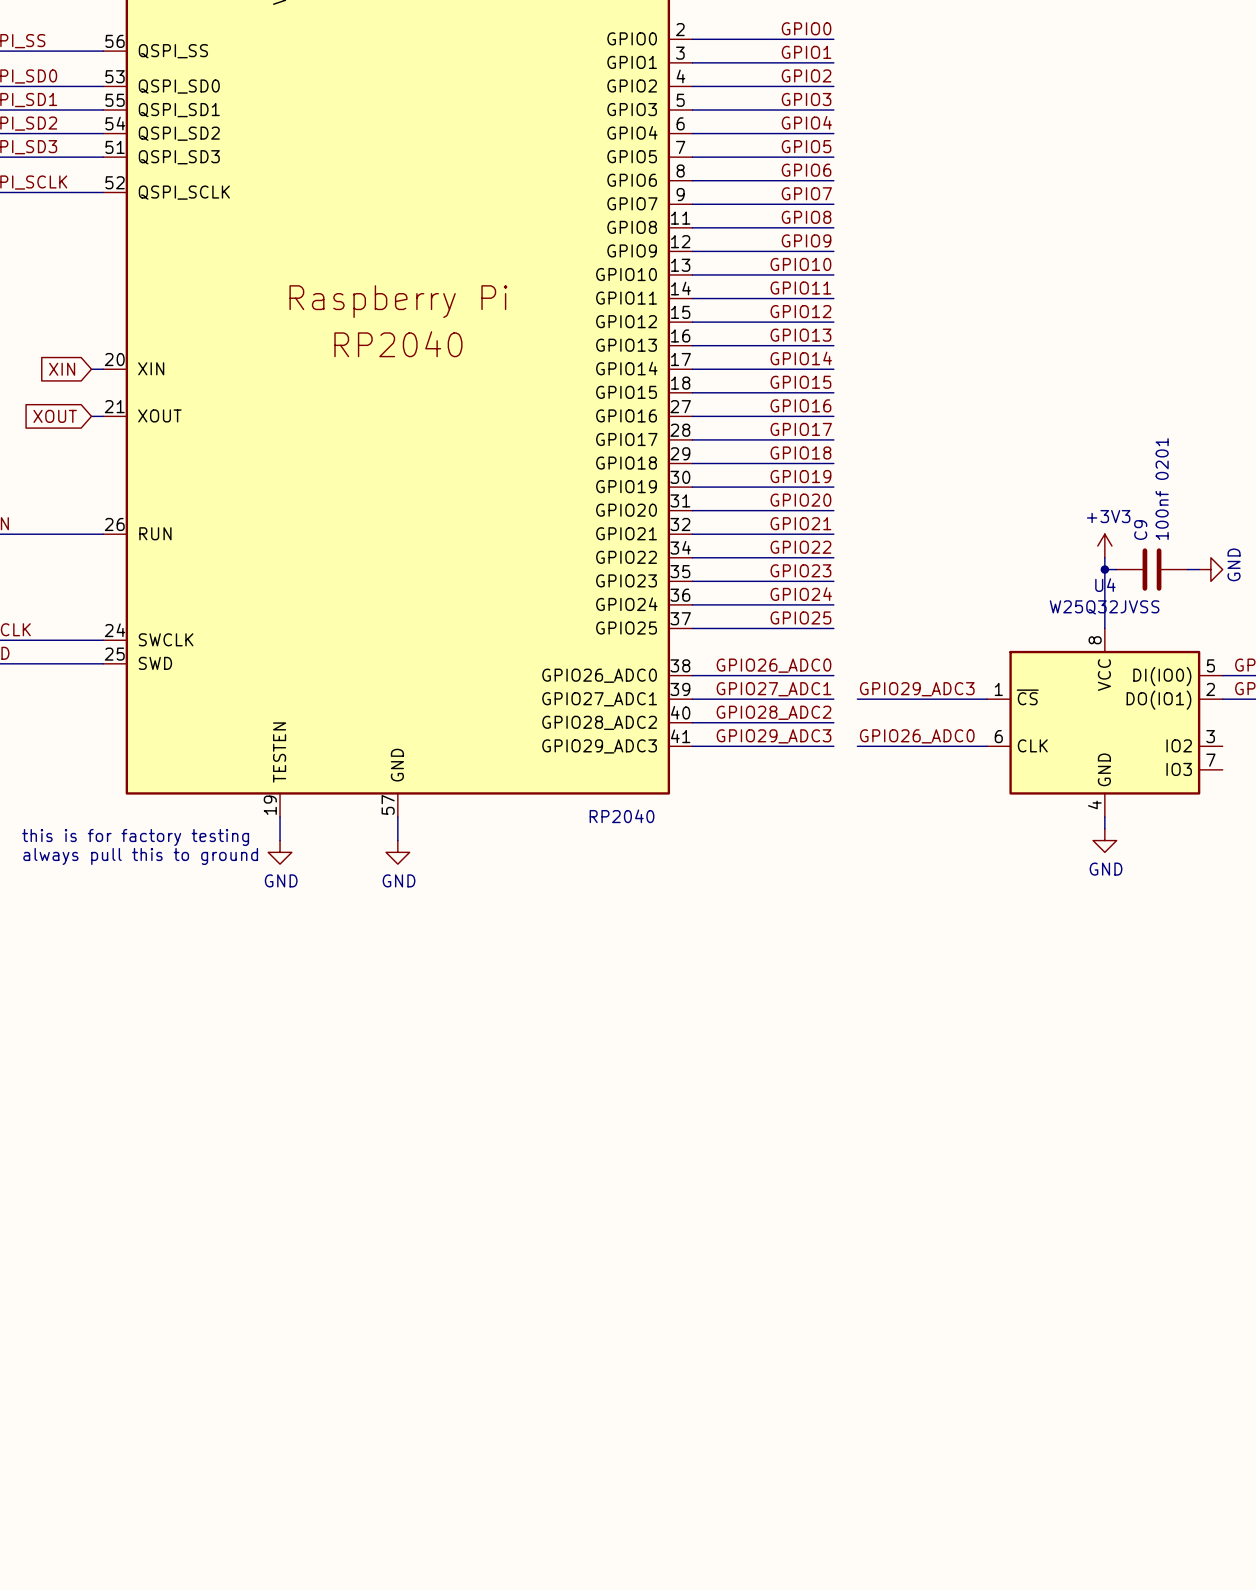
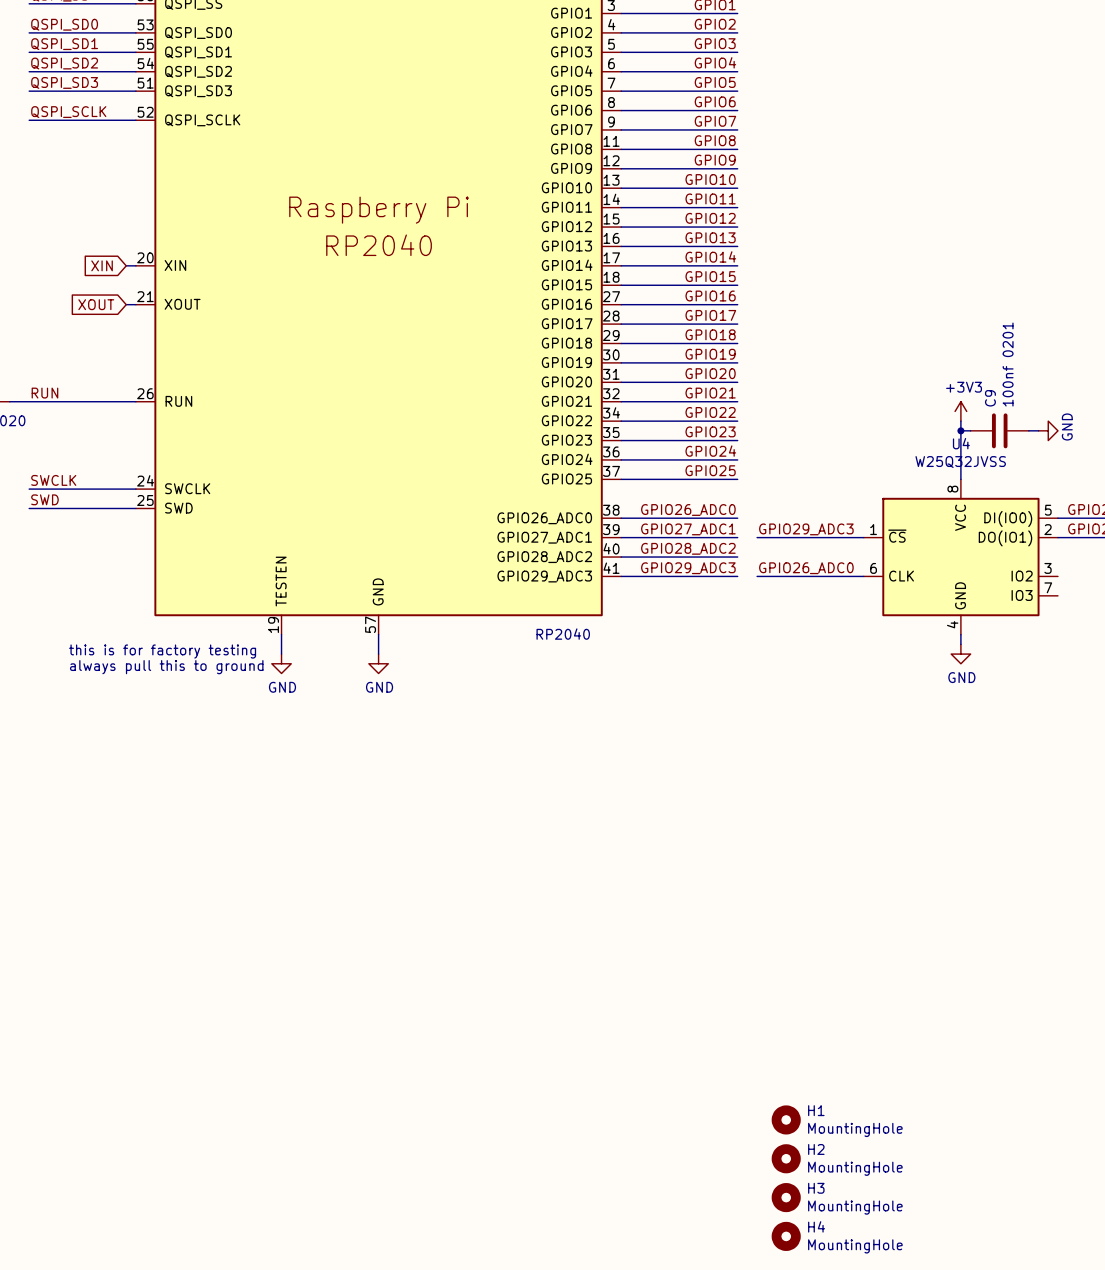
H1: none -> MountingHole (786, 1119)
H2: none -> MountingHole (786, 1158)
H3: none -> MountingHole (786, 1197)
H4: none -> MountingHole (786, 1236)

